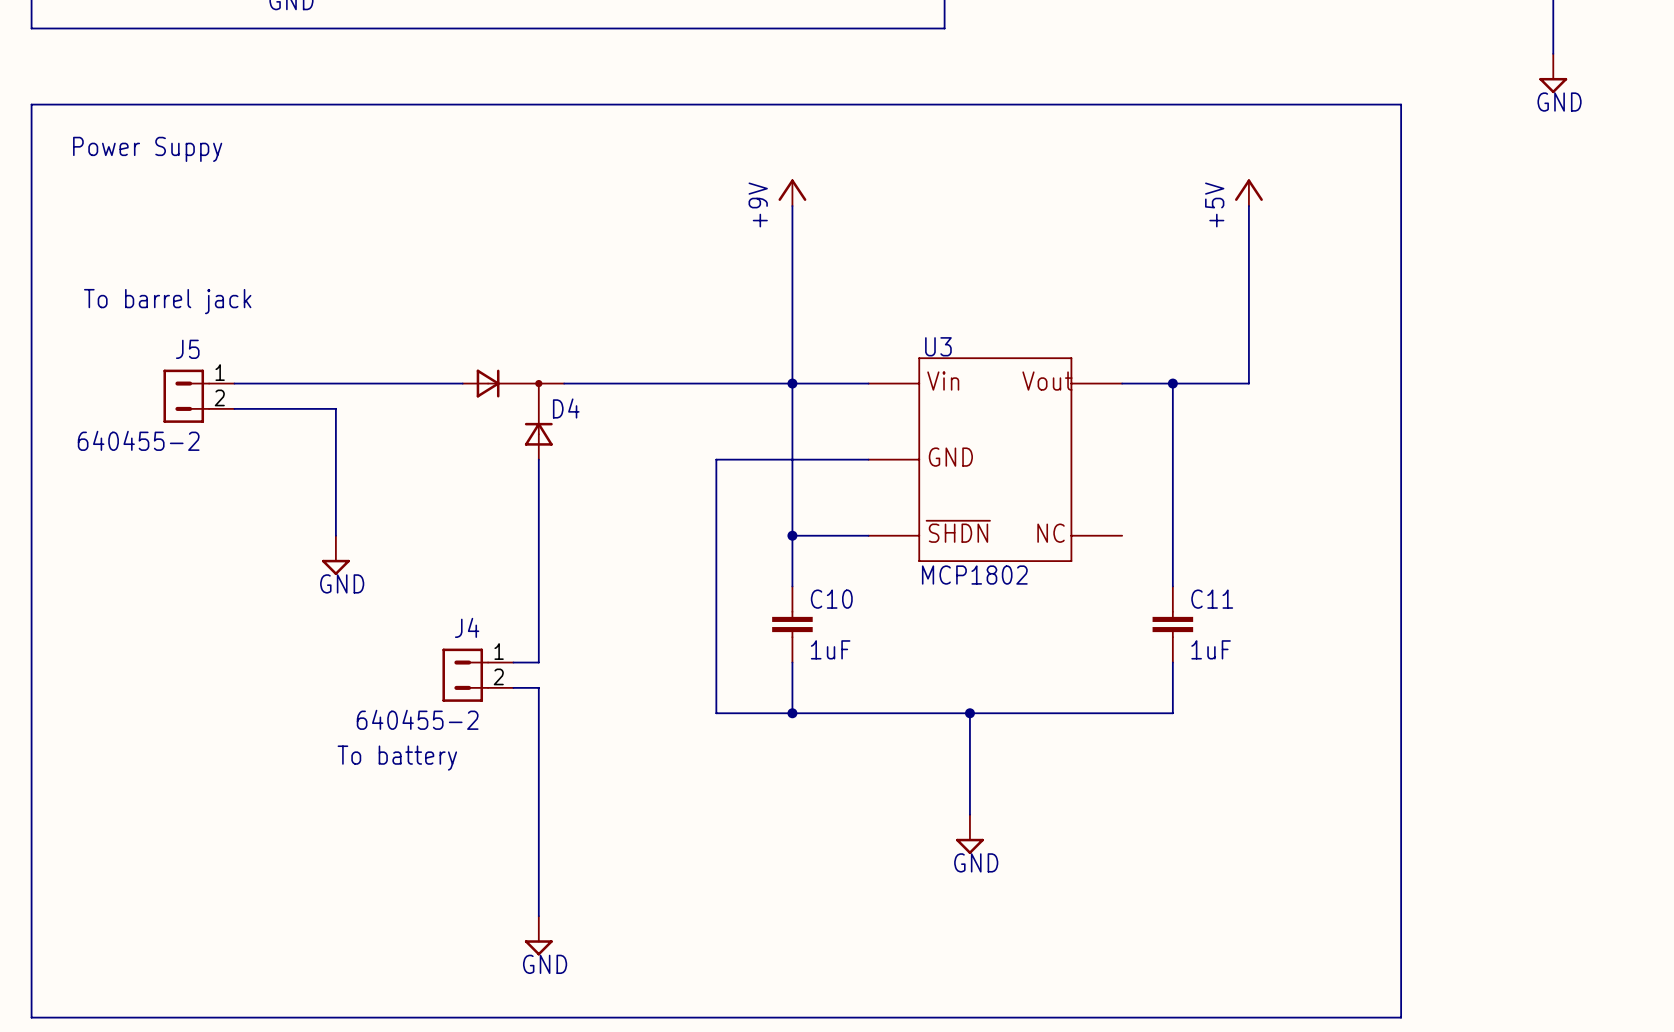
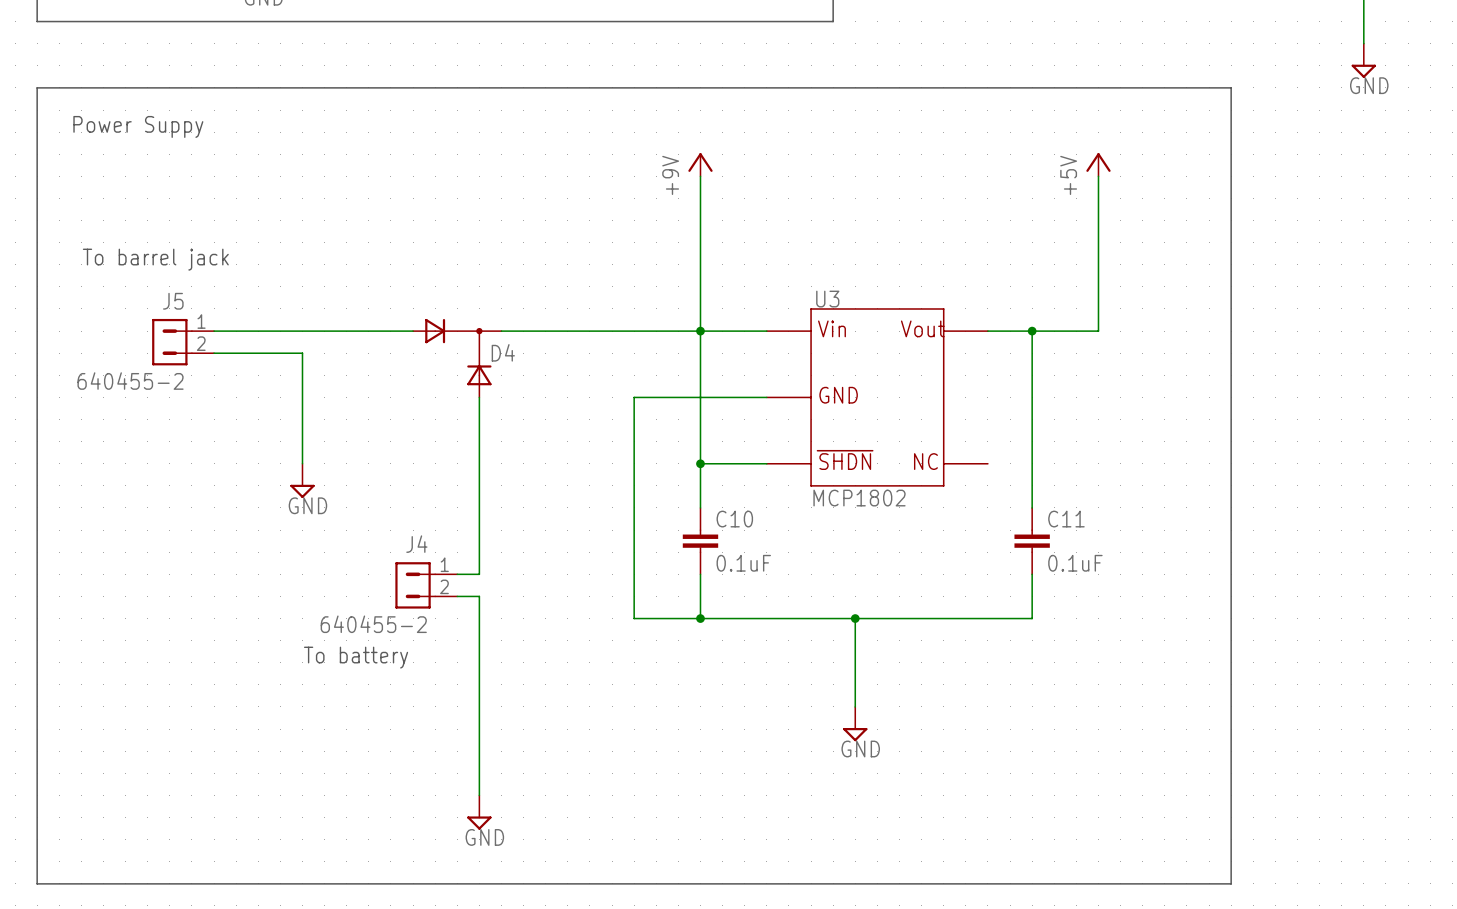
C10 value: 1uF (830, 649) -> 0.1uF (743, 563)
C11 value: 1uF (1211, 649) -> 0.1uF (1075, 563)

